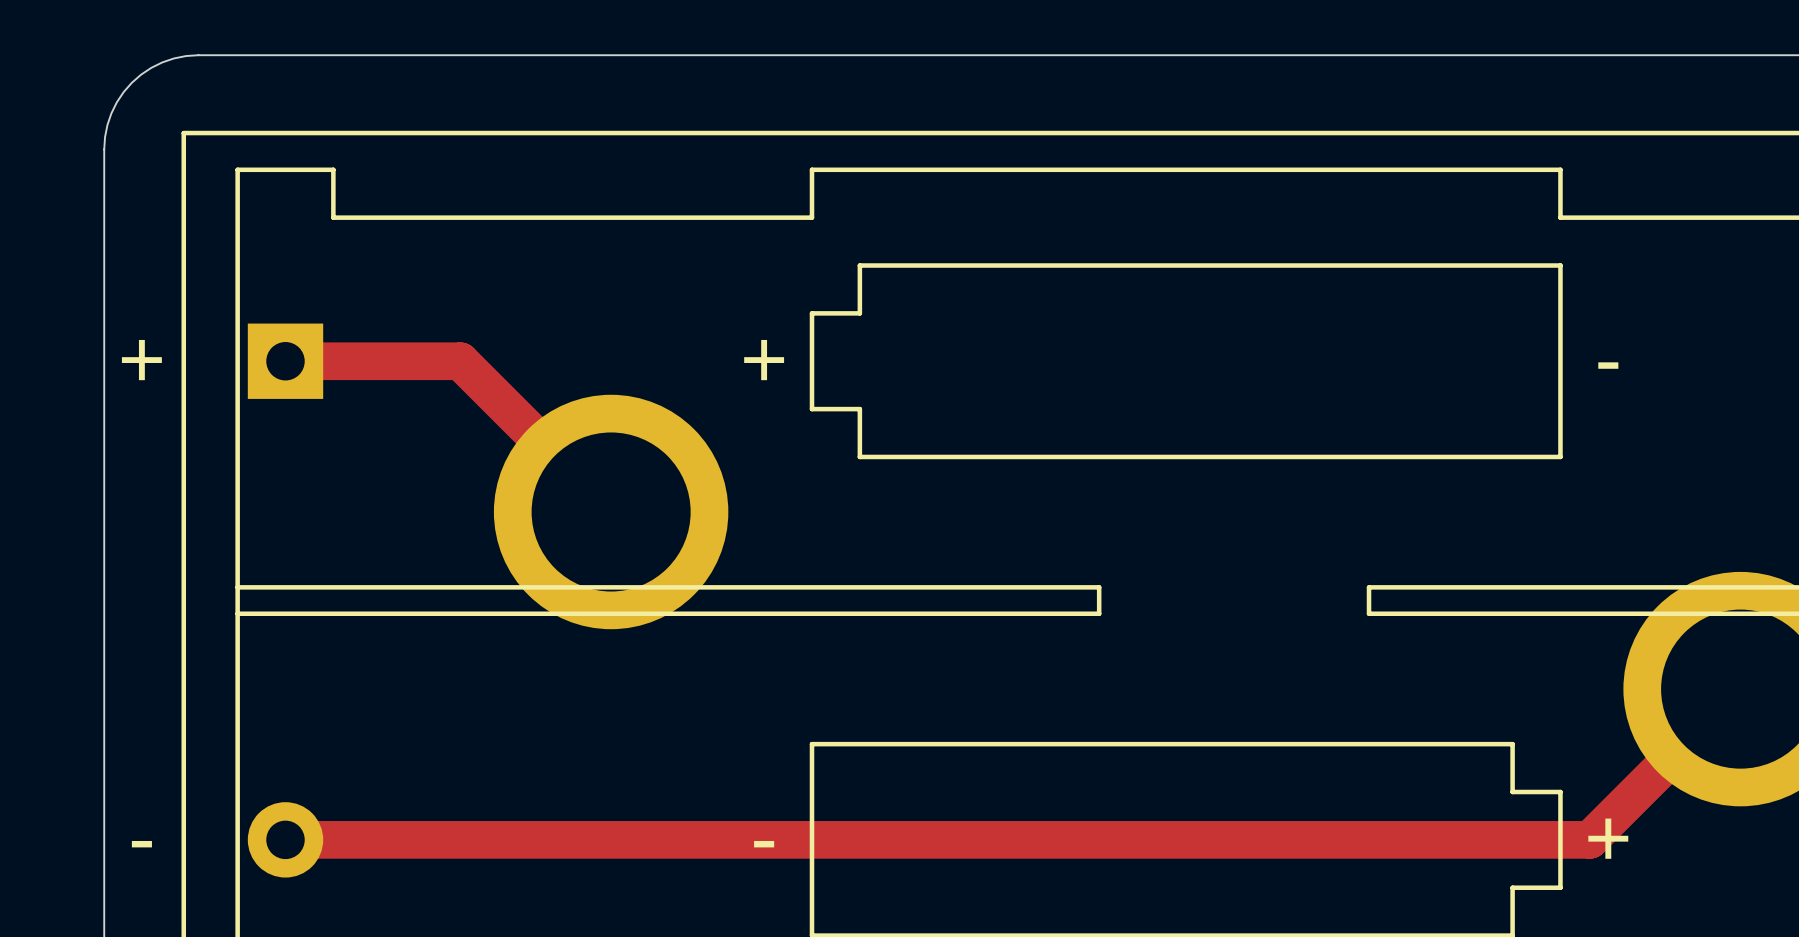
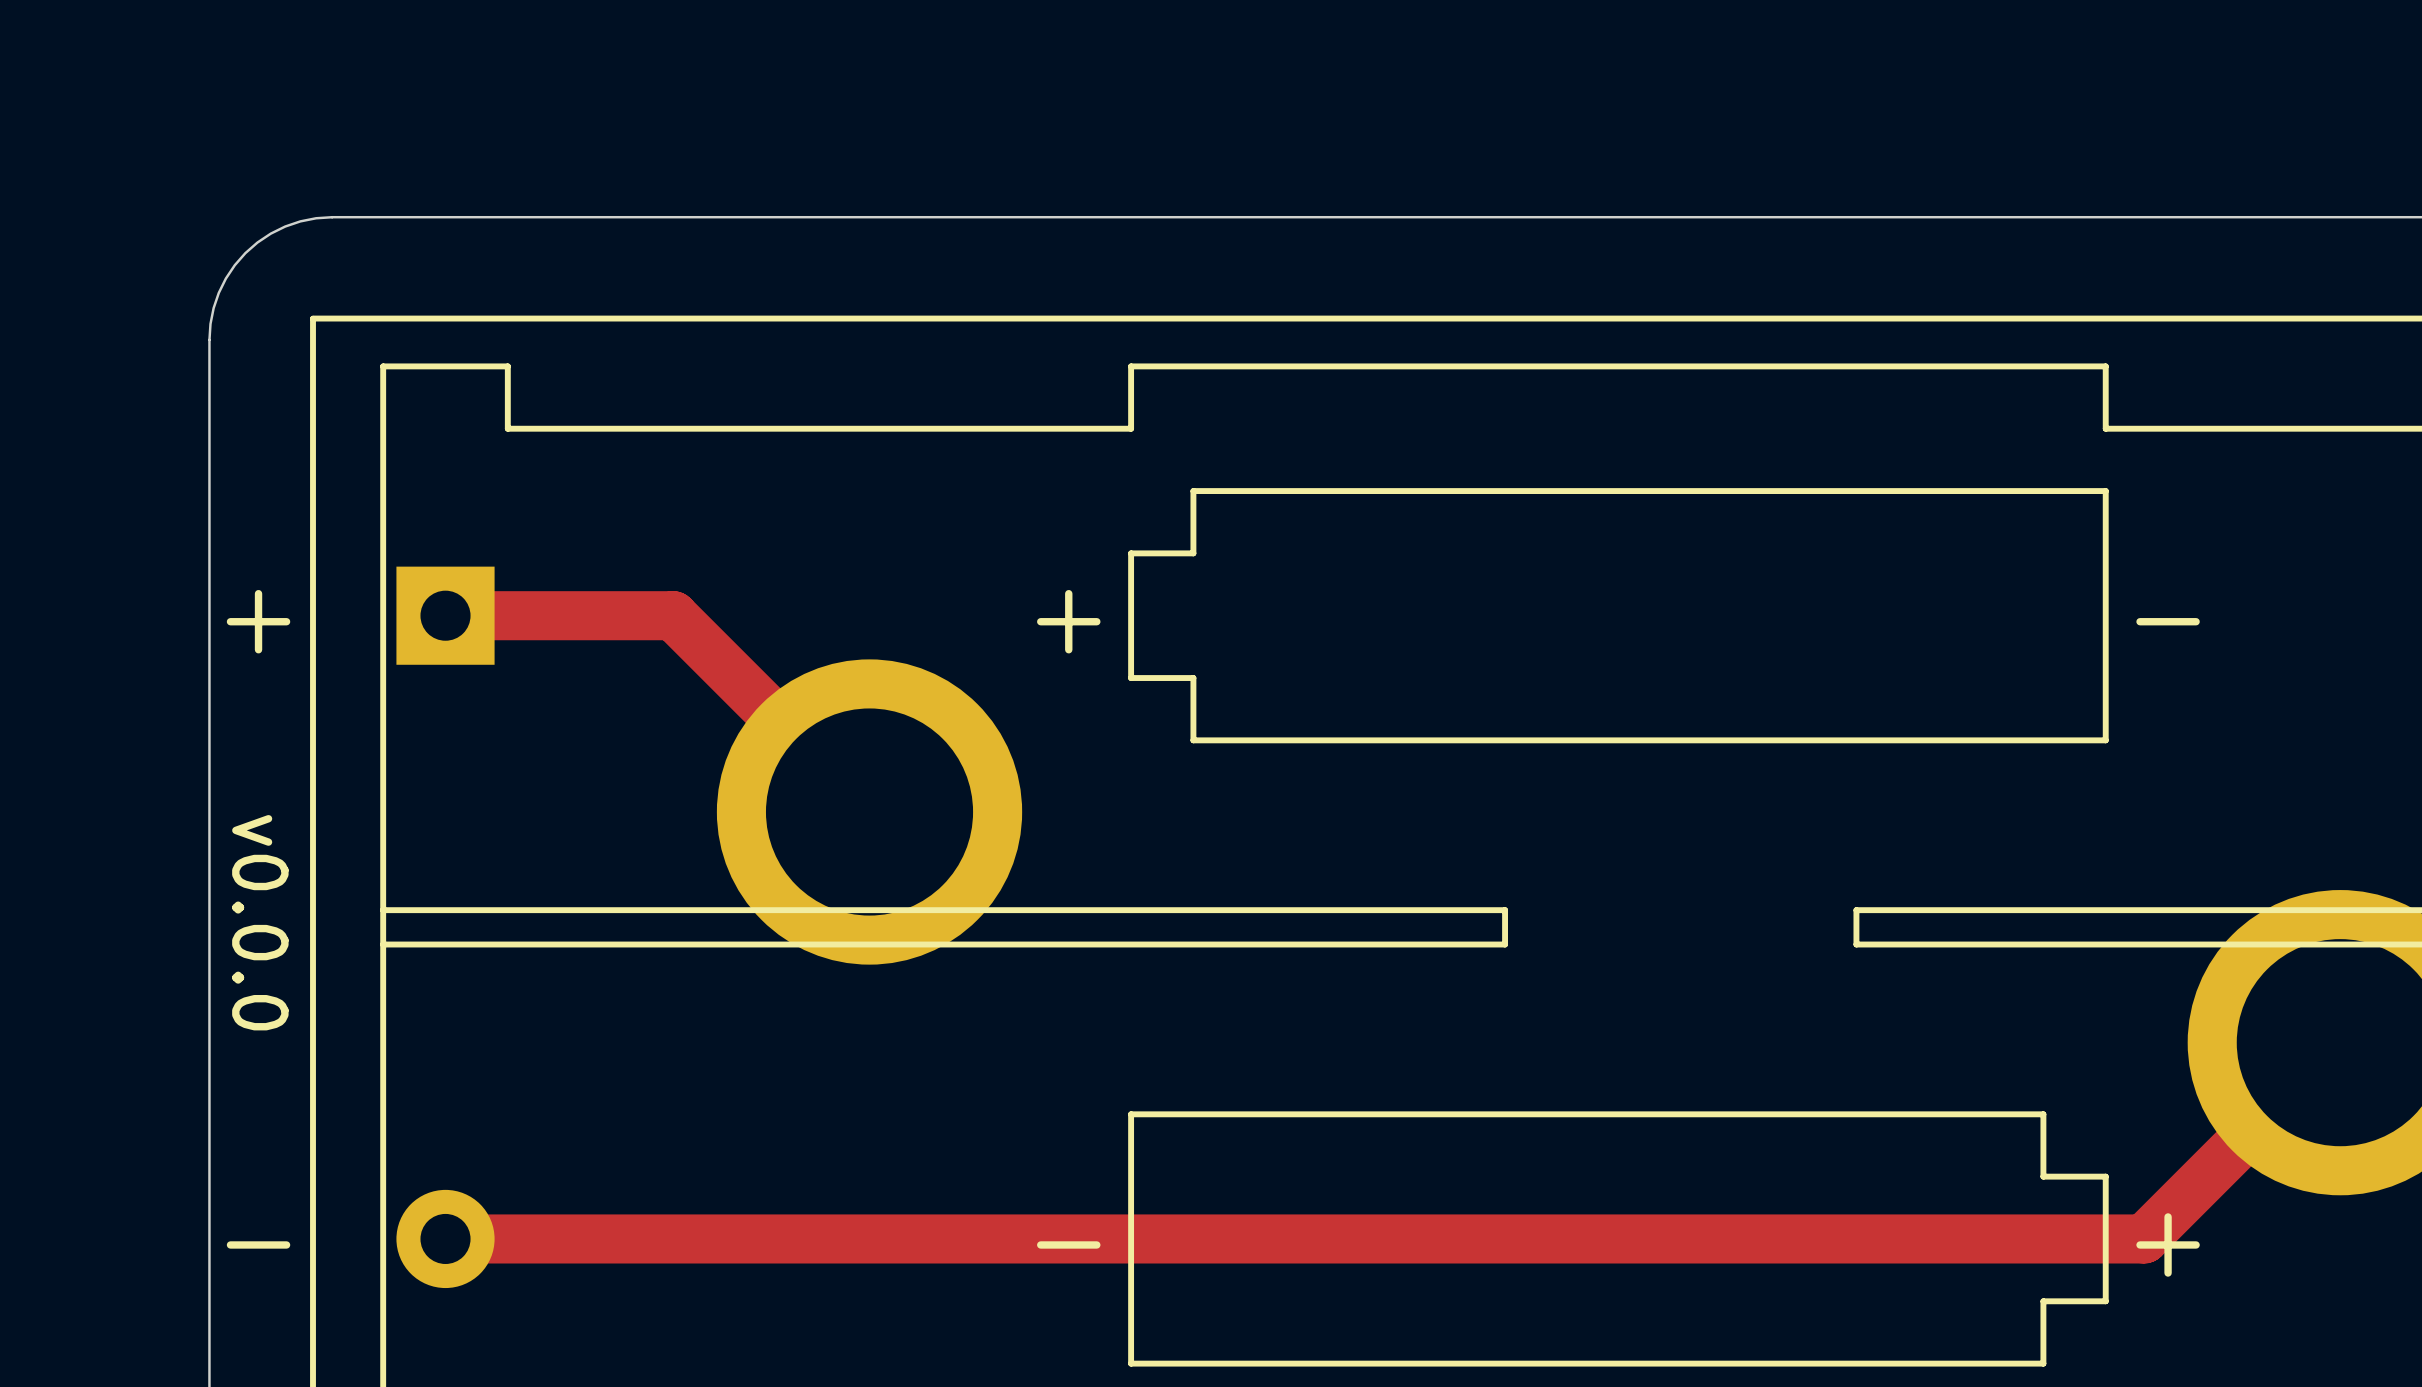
text: none -> v0.0.0 (260, 922)

